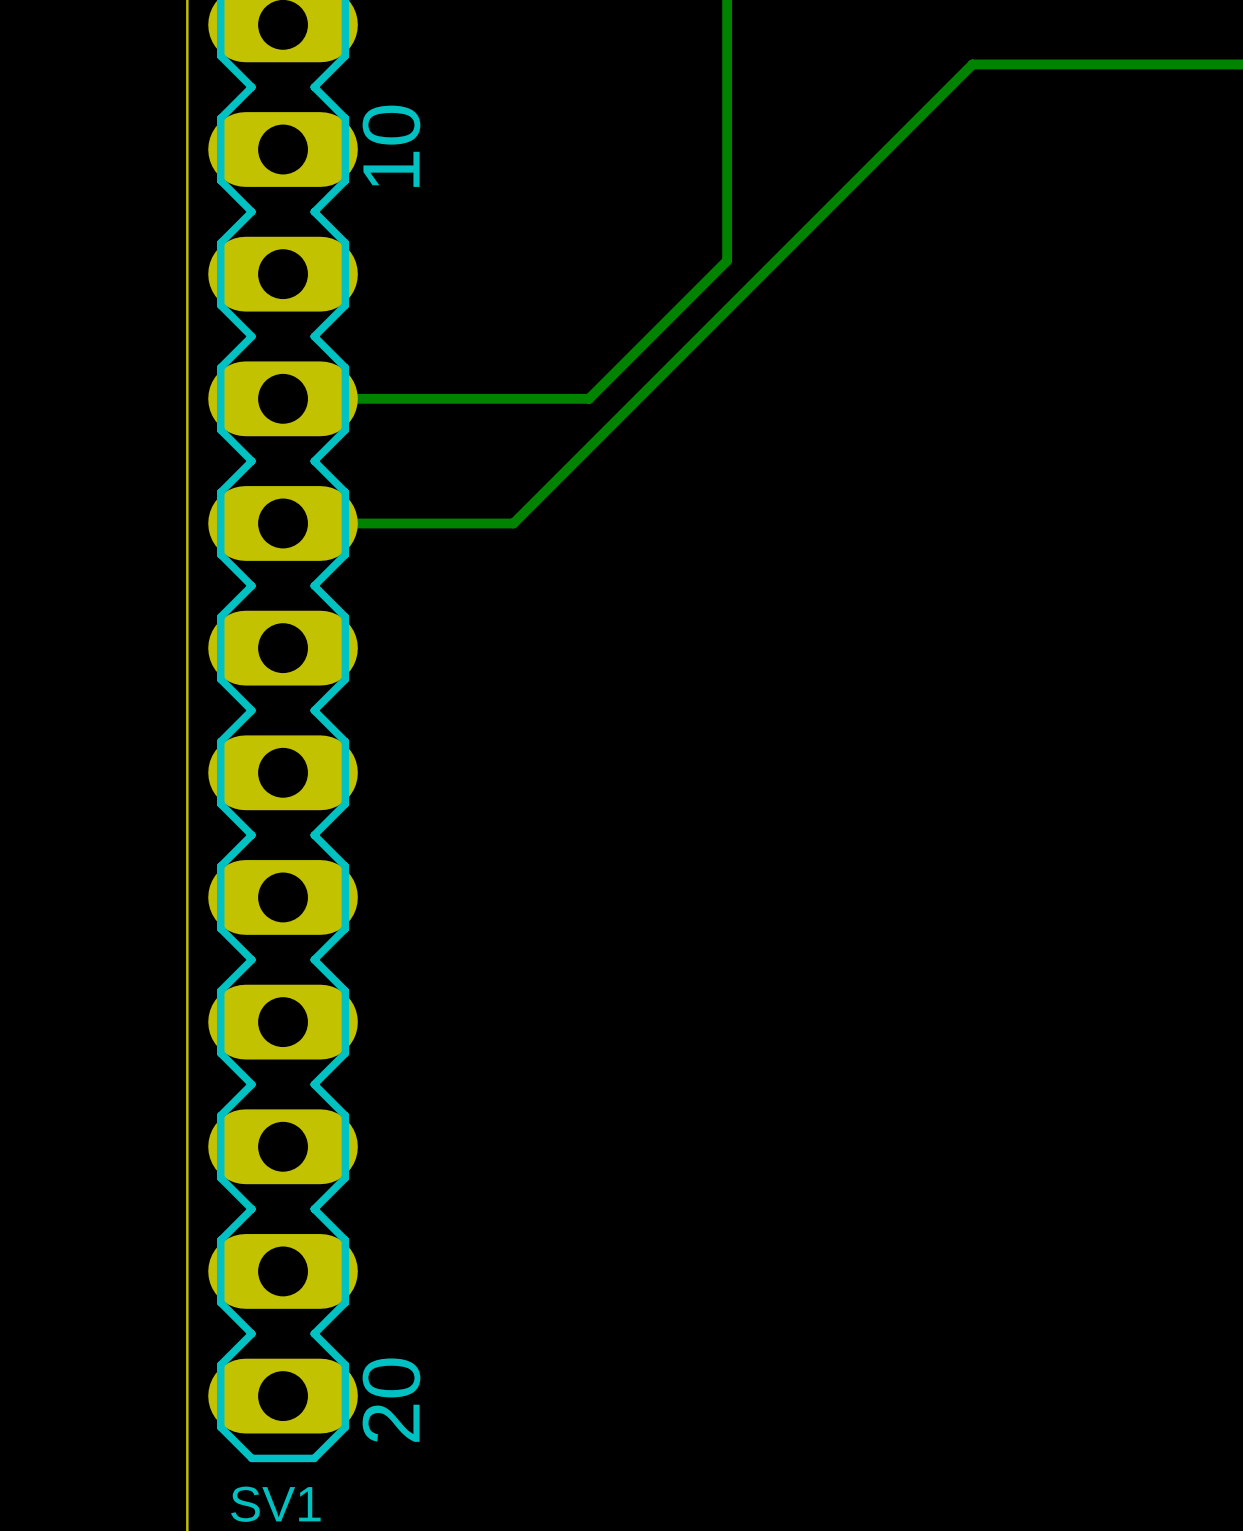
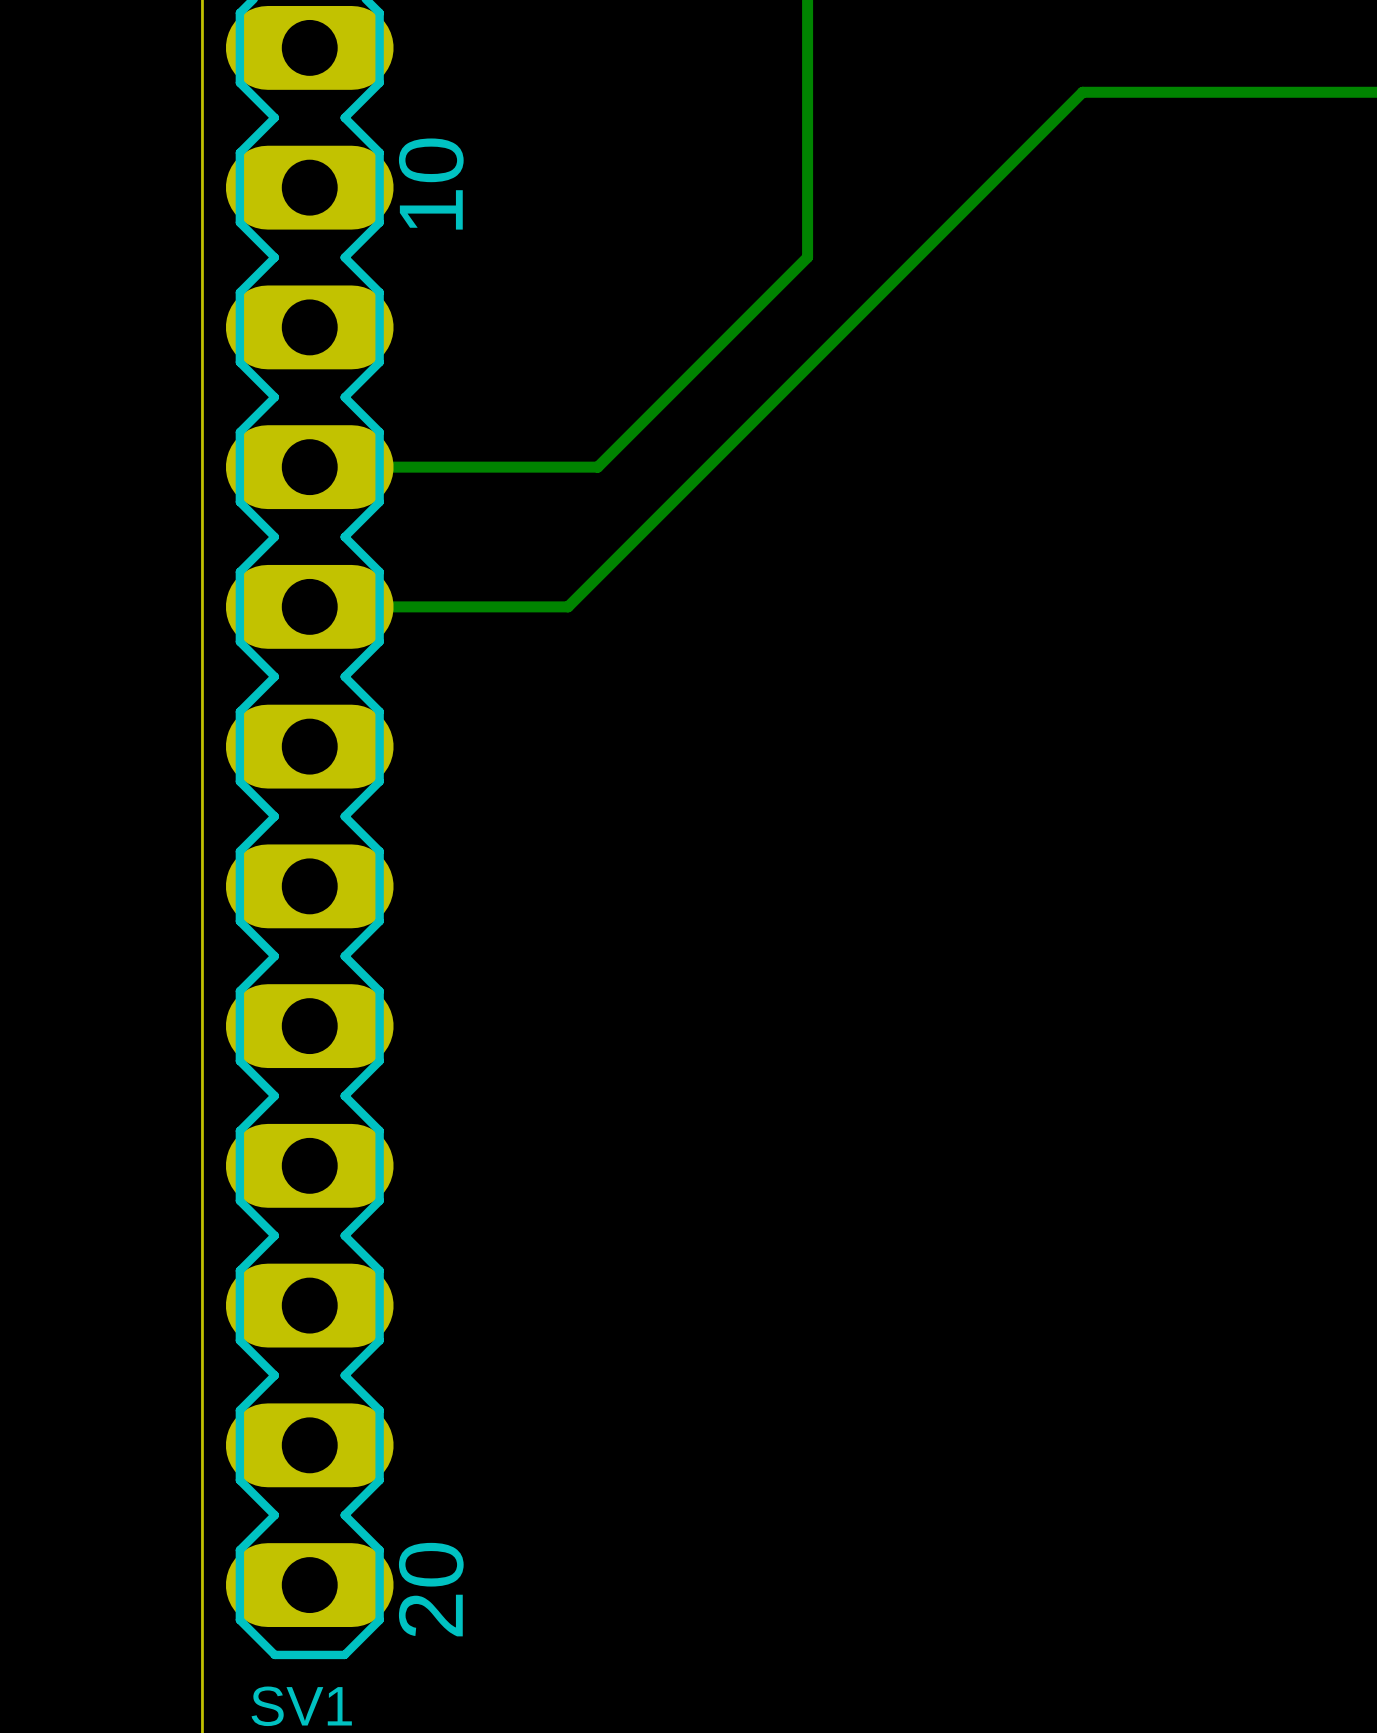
bottom track: (727, 211) (727, 260) (589, 398) (539, 398) -> (807, 257) (597, 467)

